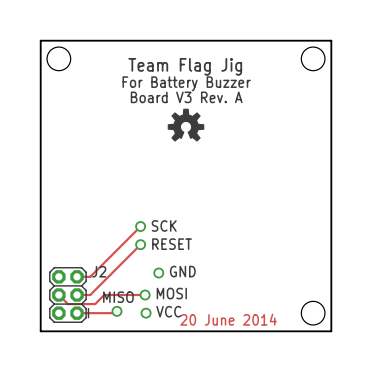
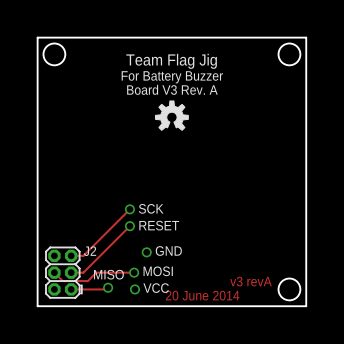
text: none -> v3 revA (250, 281)

